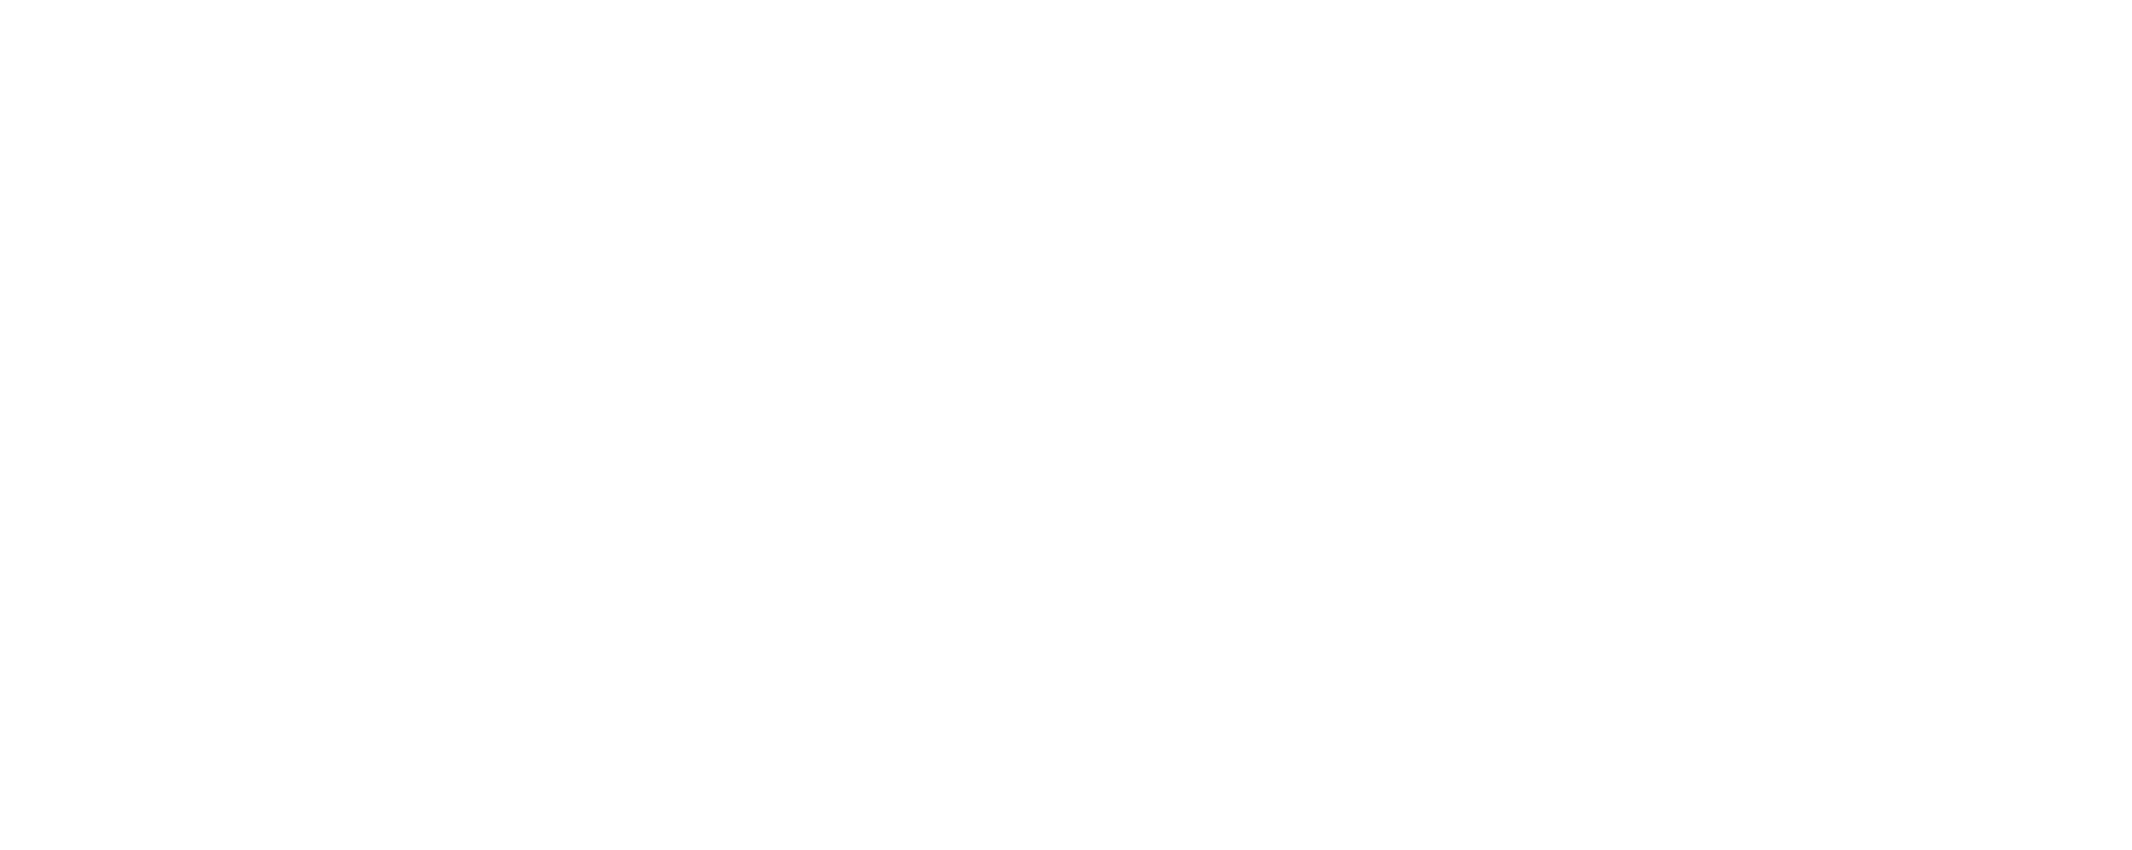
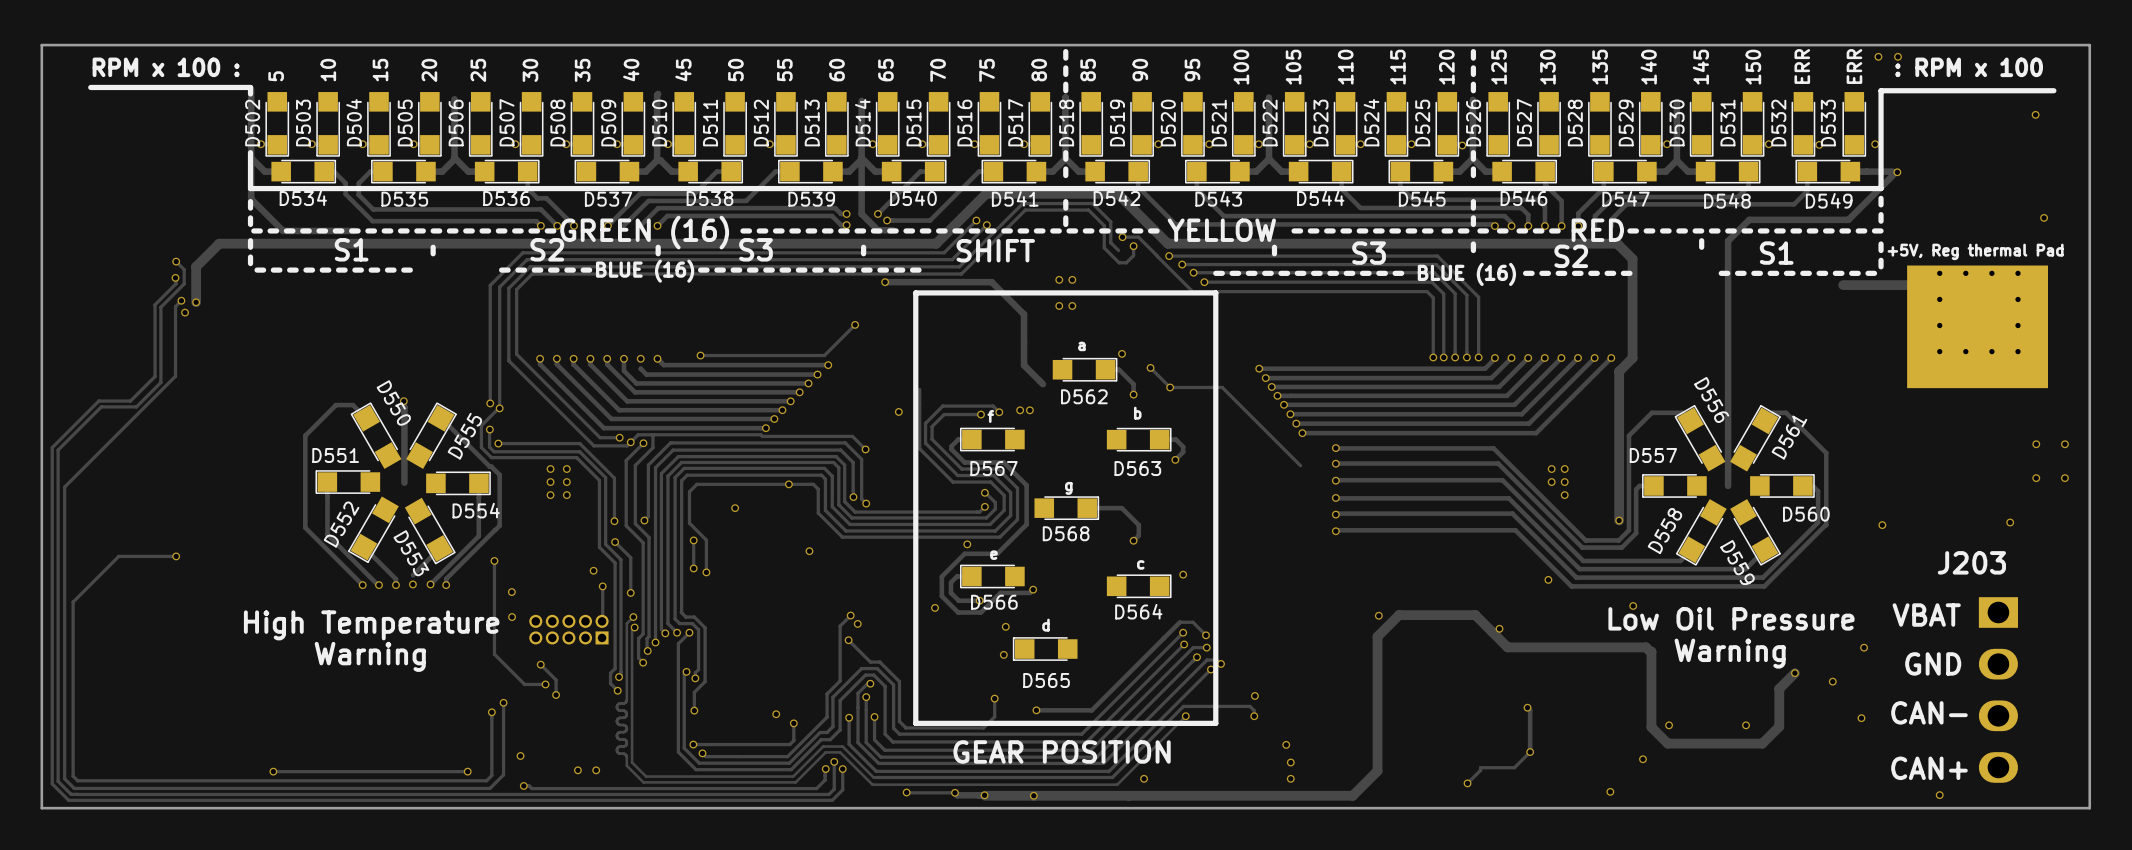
board edge: none -> (41, 45) (41, 808) (2089, 808) (2089, 45) (41, 45)
line: none -> (1065, 51) (1065, 58)
line: none -> (1473, 51) (1473, 58)
via: none -> (1878, 56)
via: none -> (1897, 56)
text: none -> ERR (1802, 66)
text: none -> ERR (1854, 66)
text: none -> RPM x 100 : (166, 67)
line: none -> (1065, 67) (1065, 74)
text: none -> 100 (1241, 67)
text: none -> 105 (1293, 67)
text: none -> 110 (1345, 67)
text: none -> 115 (1397, 67)
text: none -> 120 (1446, 67)
line: none -> (1473, 67) (1473, 74)
text: none -> 125 (1499, 67)
text: none -> 130 (1547, 67)
text: none -> 135 (1600, 67)
text: none -> 140 (1648, 67)
text: none -> 145 (1700, 67)
text: none -> 150 (1753, 67)
text: none -> : RPM x 100 (1969, 67)
text: none -> 10 (328, 70)
text: none -> 15 (380, 70)
text: none -> 20 (429, 70)
text: none -> 25 (478, 70)
text: none -> 30 (530, 70)
text: none -> 35 (582, 70)
text: none -> 40 (631, 70)
text: none -> 45 (683, 70)
text: none -> 50 (735, 70)
text: none -> 55 (784, 70)
text: none -> 60 (837, 70)
text: none -> 65 (885, 70)
text: none -> 70 (938, 70)
text: none -> 75 (987, 70)
text: none -> 80 (1039, 70)
text: none -> 85 (1088, 70)
text: none -> 90 (1140, 70)
text: none -> 95 (1192, 70)
text: none -> 5 (276, 76)
line: none -> (1065, 84) (1065, 90)
line: none -> (1473, 84) (1473, 90)
line: none -> (90, 87) (250, 87) (250, 93)
track: none -> (251, 89) (251, 199) (283, 230) (354, 230)
line: none -> (2053, 90) (1881, 90) (1881, 188) (250, 188) (250, 152)
track: none -> (658, 93) (657, 160)
track: none -> (1065, 97) (1065, 158) (1052, 171) (1036, 171)
track: none -> (1269, 97) (1269, 158)
track: none -> (454, 99) (454, 159) (442, 171) (425, 171)
track: none -> (1472, 99) (1472, 158) (1485, 171) (1502, 171)
track: none -> (861, 100) (861, 214) (877, 230) (892, 230)
track: none -> (1676, 101) (1676, 160)
via: none -> (2035, 114)
D502: none -> (277, 124)
D503: none -> (328, 124)
D504: none -> (379, 124)
D505: none -> (429, 124)
D506: none -> (480, 124)
D507: none -> (531, 124)
D508: none -> (582, 124)
D509: none -> (633, 124)
D510: none -> (684, 124)
D511: none -> (735, 124)
D512: none -> (785, 124)
D513: none -> (836, 124)
D514: none -> (887, 124)
D515: none -> (938, 124)
D516: none -> (989, 124)
D517: none -> (1040, 124)
D518: none -> (1091, 124)
D519: none -> (1142, 124)
D520: none -> (1192, 124)
D521: none -> (1243, 124)
D522: none -> (1294, 124)
D523: none -> (1345, 124)
D524: none -> (1396, 124)
D525: none -> (1447, 124)
D526: none -> (1498, 124)
D527: none -> (1549, 124)
D528: none -> (1599, 124)
D529: none -> (1650, 124)
D530: none -> (1701, 124)
D531: none -> (1752, 124)
D532: none -> (1803, 124)
D533: none -> (1854, 124)
via: none -> (260, 144)
via: none -> (311, 144)
via: none -> (362, 144)
via: none -> (413, 144)
via: none -> (515, 144)
via: none -> (566, 144)
via: none -> (617, 144)
via: none -> (667, 144)
via: none -> (769, 144)
via: none -> (872, 144)
via: none -> (922, 144)
via: none -> (974, 144)
via: none -> (1024, 144)
via: none -> (1158, 144)
via: none -> (1209, 144)
via: none -> (1258, 144)
via: none -> (1309, 144)
via: none -> (1360, 144)
via: none -> (1411, 144)
via: none -> (1667, 144)
via: none -> (1768, 144)
via: none -> (1819, 144)
via: none -> (1875, 144)
via: none -> (1462, 145)
line: none -> (1065, 152) (1065, 159)
line: none -> (1473, 152) (1473, 159)
track: none -> (251, 157) (264, 171) (281, 171)
track: none -> (454, 157) (468, 171) (484, 171)
track: none -> (861, 157) (875, 171) (891, 171)
track: none -> (1065, 158) (1078, 171) (1095, 171)
track: none -> (1269, 158) (1256, 171) (1239, 171)
track: none -> (1269, 158) (1281, 171) (1298, 171)
track: none -> (1472, 158) (1459, 171) (1443, 171)
track: none -> (861, 159) (849, 171) (832, 171)
track: none -> (657, 160) (645, 171) (629, 171)
track: none -> (657, 160) (660, 160) (671, 171) (688, 171)
track: none -> (1676, 160) (1665, 171) (1646, 171)
track: none -> (1676, 160) (1687, 171) (1705, 171)
line: none -> (1065, 169) (1065, 175)
line: none -> (1473, 169) (1473, 175)
D534: none -> (303, 171)
track: none -> (317, 171) (334, 171) (345, 183) (345, 194) (372, 221) (536, 221) (540, 225)
track: none -> (390, 171) (370, 171) (358, 183) (358, 195)
D535: none -> (403, 171)
D536: none -> (507, 171)
track: none -> (527, 171) (527, 188) (537, 198) (546, 198) (574, 225)
D537: none -> (606, 171)
D538: none -> (710, 171)
track: none -> (731, 171) (716, 171) (694, 193) (640, 193) (607, 225)
track: none -> (789, 171) (775, 171) (746, 200) (648, 200) (623, 225)
D539: none -> (810, 171)
D540: none -> (914, 171)
track: none -> (934, 171) (920, 171) (877, 214)
track: none -> (993, 171) (979, 171) (930, 220) (887, 220)
D541: none -> (1013, 171)
D542: none -> (1117, 171)
track: none -> (1138, 171) (1138, 187) (1175, 224) (1491, 224) (1493, 226)
track: none -> (1196, 171) (1196, 189) (1223, 216) (1504, 216) (1511, 222)
D543: none -> (1217, 171)
D544: none -> (1321, 171)
track: none -> (1341, 171) (1341, 189) (1360, 208) (1521, 208) (1528, 214) (1528, 226)
track: none -> (1400, 171) (1400, 186) (1413, 199) (1537, 199) (1544, 206) (1544, 226)
D545: none -> (1420, 171)
D546: none -> (1524, 171)
track: none -> (1545, 171) (1545, 184) (1561, 201) (1561, 226)
track: none -> (1603, 171) (1603, 187) (1578, 213) (1578, 226)
D547: none -> (1624, 171)
D548: none -> (1728, 171)
track: none -> (1748, 171) (1748, 186) (1737, 197) (1614, 197) (1594, 216) (1594, 226)
track: none -> (1807, 171) (1807, 191) (1794, 204) (1626, 204) (1611, 219) (1611, 226)
D549: none -> (1827, 171)
track: none -> (1850, 171) (1892, 171)
via: none -> (1897, 172)
track: none -> (1892, 175) (1848, 219) (1749, 219) (1728, 241) (1728, 485)
track: none -> (358, 195) (373, 209) (540, 209) (557, 225)
line: none -> (1881, 198) (1881, 204)
line: none -> (250, 201) (250, 208)
line: none -> (1065, 201) (1065, 208)
line: none -> (1473, 201) (1473, 208)
track: none -> (846, 214) (841, 214) (835, 208) (658, 208) (640, 225)
via: none -> (846, 214)
via: none -> (877, 214)
line: none -> (1881, 214) (1881, 221)
line: none -> (250, 217) (250, 224)
line: none -> (1065, 217) (1065, 224)
line: none -> (1473, 217) (1473, 224)
via: none -> (2044, 217)
via: none -> (887, 220)
track: none -> (976, 220) (944, 252) (522, 252) (490, 285) (490, 403)
via: none -> (976, 220)
via: none -> (540, 225)
via: none -> (557, 225)
via: none -> (574, 225)
via: none -> (607, 225)
via: none -> (657, 225)
track: none -> (846, 225) (841, 225) (831, 215) (667, 215) (657, 225)
via: none -> (846, 225)
track: none -> (986, 225) (952, 259) (527, 259) (499, 287) (499, 408) (481, 425) (481, 447) (491, 457) (576, 457) (599, 480) (599, 547) (615, 562) (615, 668) (610, 673) (610, 683) (617, 690)
via: none -> (986, 225)
via: none -> (1494, 226)
via: none -> (1511, 226)
via: none -> (1528, 226)
via: none -> (1544, 226)
via: none -> (1561, 226)
via: none -> (1578, 226)
line: none -> (253, 230) (260, 230)
line: none -> (270, 230) (276, 230)
line: none -> (286, 230) (292, 230)
line: none -> (302, 230) (309, 230)
line: none -> (319, 230) (325, 230)
line: none -> (335, 230) (341, 230)
line: none -> (351, 230) (358, 230)
line: none -> (367, 230) (374, 230)
line: none -> (384, 230) (390, 230)
line: none -> (400, 230) (407, 230)
line: none -> (416, 230) (423, 230)
line: none -> (433, 230) (439, 230)
line: none -> (449, 230) (455, 230)
line: none -> (465, 230) (472, 230)
line: none -> (482, 230) (488, 230)
line: none -> (498, 230) (504, 230)
line: none -> (514, 230) (521, 230)
line: none -> (530, 230) (537, 230)
line: none -> (547, 230) (553, 230)
line: none -> (742, 230) (749, 230)
line: none -> (759, 230) (765, 230)
line: none -> (775, 230) (782, 230)
line: none -> (791, 230) (798, 230)
line: none -> (808, 230) (814, 230)
line: none -> (824, 230) (830, 230)
line: none -> (840, 230) (847, 230)
line: none -> (857, 230) (863, 230)
line: none -> (873, 230) (879, 230)
line: none -> (889, 230) (896, 230)
line: none -> (905, 230) (912, 230)
line: none -> (922, 230) (928, 230)
line: none -> (938, 230) (945, 230)
line: none -> (954, 230) (961, 230)
line: none -> (971, 230) (977, 230)
line: none -> (987, 230) (994, 230)
line: none -> (1003, 230) (1010, 230)
line: none -> (1020, 230) (1026, 230)
line: none -> (1036, 230) (1042, 230)
line: none -> (1052, 230) (1059, 230)
line: none -> (1069, 230) (1075, 230)
line: none -> (1085, 230) (1091, 230)
line: none -> (1101, 230) (1108, 230)
line: none -> (1117, 230) (1124, 230)
line: none -> (1134, 230) (1140, 230)
line: none -> (1150, 230) (1157, 230)
text: none -> YELLOW (1221, 230)
line: none -> (1294, 230) (1300, 230)
line: none -> (1310, 230) (1316, 230)
line: none -> (1326, 230) (1333, 230)
line: none -> (1342, 230) (1349, 230)
line: none -> (1359, 230) (1365, 230)
line: none -> (1375, 230) (1382, 230)
line: none -> (1391, 230) (1398, 230)
line: none -> (1408, 230) (1414, 230)
line: none -> (1424, 230) (1431, 230)
line: none -> (1444, 230) (1450, 230)
line: none -> (1460, 230) (1466, 230)
line: none -> (1479, 230) (1486, 230)
line: none -> (1499, 230) (1506, 230)
line: none -> (1519, 230) (1525, 230)
line: none -> (1535, 230) (1541, 230)
line: none -> (1551, 230) (1558, 230)
text: none -> RED (1597, 230)
line: none -> (1629, 230) (1636, 230)
line: none -> (1646, 230) (1652, 230)
line: none -> (1662, 230) (1669, 230)
line: none -> (1678, 230) (1685, 230)
line: none -> (1695, 230) (1701, 230)
line: none -> (1711, 230) (1717, 230)
line: none -> (1727, 230) (1734, 230)
line: none -> (1744, 230) (1750, 230)
line: none -> (1760, 230) (1766, 230)
line: none -> (1776, 230) (1783, 230)
line: none -> (1792, 230) (1799, 230)
line: none -> (1809, 230) (1815, 230)
line: none -> (1825, 230) (1832, 230)
line: none -> (1841, 230) (1848, 230)
line: none -> (1858, 230) (1864, 230)
line: none -> (1874, 230) (1881, 230)
text: none -> GREEN (16) (644, 232)
track: none -> (1122, 237) (1138, 237) (1192, 291) (1427, 291) (1433, 297) (1433, 357)
via: none -> (1122, 237)
line: none -> (250, 240) (250, 247)
line: none -> (1701, 240) (1701, 247)
line: none -> (1473, 244) (1473, 250)
line: none -> (1881, 244) (1881, 250)
track: none -> (1133, 246) (1133, 255) (1126, 262) (1119, 262) (1104, 247) (1104, 225) (1088, 210) (1025, 210) (961, 274) (532, 274) (516, 289) (516, 354) (600, 437) (619, 437)
via: none -> (1133, 246)
line: none -> (433, 247) (433, 253)
line: none -> (658, 247) (658, 253)
line: none -> (863, 247) (863, 253)
line: none -> (1274, 247) (1274, 253)
text: none -> S1 (351, 249)
text: none -> S2 (547, 249)
text: none -> S3 (755, 249)
text: none -> SHIFT (995, 250)
track: none -> (1118, 250) (1110, 242) (1110, 221) (1092, 203) (1022, 203) (959, 266) (530, 266) (508, 288) (508, 360) (593, 445) (627, 445) (638, 434) (760, 434) (762, 436) (852, 436) (865, 449)
text: none -> +5V, Reg thermal Pad (1975, 251)
text: none -> S3 (1369, 253)
text: none -> S1 (1776, 253)
track: none -> (1169, 256) (1437, 256) (1478, 297) (1478, 357)
via: none -> (1169, 256)
text: none -> S2 (1571, 256)
line: none -> (250, 257) (250, 263)
line: none -> (1881, 260) (1881, 266)
track: none -> (176, 261) (184, 269) (184, 283) (160, 307) (160, 382) (136, 406) (101, 406) (58, 450) (58, 781) (71, 794) (77, 794)
via: none -> (176, 261)
track: none -> (1182, 264) (1436, 264) (1466, 295) (1466, 357)
via: none -> (1182, 264)
line: none -> (257, 270) (263, 270)
line: none -> (273, 270) (279, 270)
line: none -> (289, 270) (296, 270)
line: none -> (305, 270) (312, 270)
line: none -> (322, 270) (328, 270)
line: none -> (338, 270) (345, 270)
line: none -> (354, 270) (361, 270)
line: none -> (371, 270) (377, 270)
line: none -> (387, 270) (394, 270)
line: none -> (403, 270) (410, 270)
line: none -> (501, 270) (508, 270)
line: none -> (517, 270) (524, 270)
line: none -> (534, 270) (540, 270)
line: none -> (550, 270) (557, 270)
line: none -> (566, 270) (573, 270)
line: none -> (583, 270) (589, 270)
line: none -> (700, 270) (707, 270)
line: none -> (716, 270) (723, 270)
line: none -> (733, 270) (739, 270)
line: none -> (749, 270) (755, 270)
line: none -> (765, 270) (772, 270)
line: none -> (782, 270) (788, 270)
line: none -> (798, 270) (804, 270)
line: none -> (814, 270) (821, 270)
line: none -> (830, 270) (837, 270)
line: none -> (847, 270) (853, 270)
line: none -> (863, 270) (870, 270)
line: none -> (879, 270) (886, 270)
line: none -> (896, 270) (902, 270)
line: none -> (912, 270) (919, 270)
text: none -> BLUE (16) (645, 271)
track: none -> (1193, 272) (1434, 272) (1455, 293) (1455, 357)
via: none -> (1193, 272)
line: none -> (1215, 273) (1222, 273)
line: none -> (1232, 273) (1238, 273)
line: none -> (1248, 273) (1254, 273)
line: none -> (1264, 273) (1271, 273)
line: none -> (1281, 273) (1287, 273)
line: none -> (1297, 273) (1303, 273)
line: none -> (1313, 273) (1320, 273)
line: none -> (1329, 273) (1336, 273)
line: none -> (1346, 273) (1352, 273)
line: none -> (1362, 273) (1369, 273)
line: none -> (1378, 273) (1385, 273)
line: none -> (1395, 273) (1401, 273)
line: none -> (1525, 273) (1532, 273)
line: none -> (1541, 273) (1548, 273)
line: none -> (1558, 273) (1564, 273)
line: none -> (1574, 273) (1581, 273)
line: none -> (1590, 273) (1597, 273)
line: none -> (1607, 273) (1613, 273)
line: none -> (1623, 273) (1629, 273)
line: none -> (1721, 273) (1727, 273)
line: none -> (1737, 273) (1744, 273)
line: none -> (1753, 273) (1760, 273)
line: none -> (1770, 273) (1776, 273)
line: none -> (1786, 273) (1792, 273)
line: none -> (1802, 273) (1809, 273)
line: none -> (1819, 273) (1825, 273)
line: none -> (1835, 273) (1841, 273)
line: none -> (1851, 273) (1858, 273)
line: none -> (1867, 273) (1874, 273)
text: none -> BLUE (16) (1466, 274)
via: none -> (175, 277)
track: none -> (176, 277) (176, 283) (155, 304) (155, 376) (130, 401) (98, 401) (52, 447) (52, 783) (68, 800) (832, 800) (842, 789) (842, 769)
via: none -> (1059, 279)
via: none -> (1072, 279)
track: none -> (885, 282) (991, 282) (1024, 314) (1024, 365) (1042, 384)
via: none -> (885, 282)
track: none -> (1204, 282) (1431, 282) (1443, 293) (1443, 357)
via: none -> (1204, 282)
track: none -> (1843, 285) (1935, 285) (1977, 326)
line: none -> (915, 292) (915, 723) (1215, 723) (1215, 292) (915, 292)
track: none -> (181, 300) (175, 306) (175, 376) (64, 487) (64, 778) (74, 788) (490, 788) (503, 774) (503, 702)
via: none -> (181, 300)
track: none -> (196, 302) (196, 266) (219, 243) (936, 243) (986, 193) (1117, 193) (1167, 243) (1617, 243) (1632, 258) (1632, 358) (1619, 371) (1619, 520)
via: none -> (196, 302)
via: none -> (1059, 305)
via: none -> (1072, 305)
via: none -> (185, 312)
track: none -> (855, 324) (824, 355) (700, 355)
via: none -> (855, 324)
part: none -> (1977, 326)
text: none -> a (1081, 346)
via: none -> (1122, 353)
via: none -> (700, 355)
via: none -> (1433, 357)
via: none -> (1443, 357)
via: none -> (1455, 357)
via: none -> (1466, 357)
via: none -> (1478, 357)
track: none -> (540, 358) (540, 364) (603, 428) (765, 428)
via: none -> (540, 358)
track: none -> (556, 358) (556, 364) (611, 418) (774, 418)
via: none -> (556, 358)
via: none -> (573, 358)
via: none -> (590, 358)
track: none -> (607, 358) (607, 364) (635, 392) (799, 392)
via: none -> (607, 358)
track: none -> (623, 358) (623, 370) (636, 383) (808, 383)
via: none -> (623, 358)
via: none -> (640, 358)
via: none -> (657, 358)
track: none -> (1494, 358) (1485, 368) (1259, 368)
via: none -> (1494, 358)
track: none -> (1511, 358) (1491, 378) (1265, 378)
via: none -> (1511, 358)
track: none -> (1528, 358) (1499, 386) (1271, 386)
via: none -> (1528, 358)
track: none -> (1544, 358) (1506, 395) (1277, 395)
via: none -> (1544, 358)
track: none -> (1561, 358) (1514, 404) (1284, 404)
via: none -> (1561, 358)
track: none -> (1578, 358) (1521, 414) (1290, 414)
via: none -> (1578, 358)
track: none -> (1594, 358) (1529, 423) (1296, 423)
via: none -> (1594, 358)
track: none -> (1611, 358) (1536, 433) (1302, 433)
via: none -> (1611, 358)
track: none -> (657, 359) (663, 365) (828, 365)
track: none -> (573, 364) (619, 410) (782, 410)
track: none -> (590, 364) (627, 401) (790, 401)
via: none -> (828, 365)
track: none -> (1150, 367) (1170, 387) (1222, 387) (1300, 465)
via: none -> (1150, 367)
track: none -> (641, 368) (646, 374) (817, 374)
via: none -> (1259, 368)
D562: none -> (1085, 369)
track: none -> (1105, 369) (1119, 369) (1133, 384) (1133, 394)
via: none -> (817, 374)
via: none -> (1265, 378)
via: none -> (808, 383)
via: none -> (1271, 386)
via: none -> (1170, 387)
track: none -> (919, 389) (919, 448) (952, 482) (990, 482) (1004, 495) (1004, 510) (990, 524) (849, 524) (832, 506) (832, 476) (824, 468) (684, 468) (675, 477) (675, 619) (679, 623) (692, 623) (698, 629) (698, 669) (695, 672) (695, 678)
via: none -> (799, 392)
via: none -> (1133, 394)
via: none -> (1277, 395)
track: none -> (403, 401) (404, 482)
via: none -> (403, 401)
via: none -> (790, 401)
via: none -> (490, 403)
via: none -> (1284, 404)
via: none -> (499, 408)
via: none -> (782, 410)
via: none -> (1020, 410)
via: none -> (1029, 410)
via: none -> (898, 411)
track: none -> (999, 412) (993, 406) (942, 406) (925, 423) (925, 443) (957, 475) (993, 475) (1010, 492) (1010, 515) (995, 530) (845, 530) (825, 510) (825, 479) (821, 475) (687, 475) (681, 480) (681, 612) (685, 617) (694, 617) (705, 627) (705, 681) (694, 692) (694, 710)
via: none -> (999, 412)
text: none -> b (1137, 413)
track: none -> (980, 414) (944, 414) (932, 426) (932, 439) (961, 469) (998, 469) (1017, 488) (1017, 519) (999, 537) (842, 537) (818, 513) (818, 489) (813, 484) (696, 484) (689, 491) (689, 523) (706, 540) (706, 572)
via: none -> (980, 414)
via: none -> (1290, 414)
text: none -> f (990, 416)
track: none -> (366, 418) (352, 405) (335, 405) (305, 435) (305, 527) (362, 585)
track: none -> (441, 418) (499, 474) (499, 525) (446, 578) (446, 585)
via: none -> (774, 418)
track: none -> (1690, 420) (1682, 412) (1651, 412) (1628, 435) (1628, 530) (1618, 540) (1585, 540) (1493, 448) (1335, 448)
track: none -> (1765, 420) (1773, 412) (1786, 412) (1826, 453) (1826, 525) (1764, 586) (1571, 586) (1515, 530) (1335, 531)
via: none -> (1296, 423)
via: none -> (765, 428)
track: none -> (489, 429) (489, 447) (494, 451) (579, 451) (605, 477) (605, 544) (620, 559) (620, 675) (619, 677)
via: none -> (489, 429)
via: none -> (1302, 433)
track: none -> (652, 434) (652, 447) (635, 465) (635, 523) (649, 537) (647, 650)
D550: none -> (376, 435)
D555: none -> (431, 435)
via: none -> (619, 437)
D556: none -> (1699, 438)
D561: none -> (1755, 438)
track: none -> (971, 439) (958, 439) (951, 446) (951, 449) (964, 462) (1003, 462) (1026, 485) (1026, 524) (997, 553) (964, 553) (941, 576) (941, 596) (958, 612) (980, 612) (1000, 592) (1029, 592) (1033, 589)
D567: none -> (992, 439)
D563: none -> (1139, 439)
track: none -> (1159, 439) (1176, 439) (1183, 446) (1183, 452) (1175, 459)
via: none -> (630, 442)
track: none -> (498, 443) (579, 443) (614, 478) (614, 521)
via: none -> (498, 443)
track: none -> (643, 443) (626, 460) (626, 525) (643, 542) (643, 634) (638, 638) (638, 658) (643, 662)
via: none -> (643, 443)
via: none -> (2036, 444)
via: none -> (2064, 444)
via: none -> (1335, 448)
via: none -> (865, 449)
via: none -> (1175, 459)
track: none -> (1335, 463) (1498, 463) (1582, 547) (1621, 547) (1636, 533) (1636, 489) (1639, 485) (1653, 485)
via: none -> (1335, 463)
via: none -> (550, 469)
via: none -> (566, 469)
via: none -> (1551, 469)
via: none -> (1564, 469)
via: none -> (2036, 478)
via: none -> (2064, 478)
track: none -> (1335, 480) (1502, 480) (1583, 560) (1680, 560) (1691, 549)
via: none -> (1335, 480)
D551: none -> (347, 482)
via: none -> (550, 482)
via: none -> (566, 482)
via: none -> (1551, 482)
via: none -> (1564, 482)
D554: none -> (458, 483)
via: none -> (788, 484)
D557: none -> (1674, 485)
D560: none -> (1782, 485)
track: none -> (1802, 485) (1812, 485) (1818, 491) (1818, 522) (1762, 577) (1576, 577) (1512, 513) (1335, 514)
text: none -> g (1068, 488)
via: none -> (984, 492)
track: none -> (985, 492) (995, 502) (995, 509) (986, 517) (851, 517) (838, 504) (838, 467) (833, 462) (681, 462) (667, 476) (667, 623) (677, 632)
via: none -> (550, 495)
via: none -> (566, 495)
via: none -> (1564, 495)
track: none -> (327, 496) (327, 534) (379, 585)
track: none -> (478, 497) (478, 536) (430, 584)
track: none -> (853, 497) (853, 462) (840, 450) (673, 450) (655, 467) (655, 642)
via: none -> (853, 497)
track: none -> (1335, 497) (1508, 498) (1579, 569) (1745, 569) (1765, 549)
via: none -> (1335, 497)
track: none -> (866, 503) (861, 499) (861, 459) (845, 442) (670, 442) (648, 465) (648, 516) (644, 520)
via: none -> (866, 503)
track: none -> (984, 506) (979, 512) (855, 512) (844, 501) (844, 465) (836, 456) (678, 456) (661, 473) (661, 629) (665, 633)
via: none -> (984, 506)
via: none -> (735, 508)
D568: none -> (1066, 508)
track: none -> (1087, 508) (1121, 508) (1138, 525) (1138, 535) (1133, 540)
via: none -> (1335, 514)
via: none -> (644, 520)
via: none -> (1619, 520)
via: none -> (614, 521)
via: none -> (2010, 522)
via: none -> (1882, 525)
D552: none -> (373, 529)
D553: none -> (430, 531)
via: none -> (1335, 531)
D558: none -> (1701, 532)
D559: none -> (1755, 532)
track: none -> (693, 540) (693, 568)
via: none -> (693, 540)
via: none -> (1133, 540)
track: none -> (615, 542) (630, 557) (630, 592)
via: none -> (615, 542)
via: none -> (967, 544)
track: none -> (363, 547) (395, 579) (395, 585)
track: none -> (439, 548) (412, 575)
via: none -> (809, 551)
text: none -> e (994, 555)
track: none -> (176, 556) (118, 556) (73, 602) (73, 776) (77, 780) (486, 780) (491, 775) (491, 712)
via: none -> (176, 556)
track: none -> (494, 560) (494, 654) (524, 684) (545, 684)
via: none -> (494, 560)
text: none -> J203 (1971, 562)
text: none -> c (1140, 564)
via: none -> (693, 568)
via: none -> (593, 570)
via: none -> (706, 572)
via: none -> (1183, 574)
track: none -> (971, 576) (956, 576) (950, 582) (950, 592) (958, 600) (979, 600)
D566: none -> (992, 576)
via: none -> (1548, 579)
via: none -> (412, 584)
via: none -> (430, 584)
via: none -> (362, 585)
via: none -> (379, 585)
via: none -> (395, 585)
via: none -> (446, 585)
track: none -> (602, 586) (602, 621)
via: none -> (602, 586)
D564: none -> (1139, 586)
via: none -> (1033, 589)
via: none -> (511, 592)
via: none -> (630, 592)
via: none -> (979, 600)
via: none -> (1633, 605)
via: none -> (935, 607)
track: none -> (850, 615) (840, 626) (840, 680) (827, 694) (827, 717) (787, 756) (705, 756) (702, 753)
via: none -> (850, 615)
via: none -> (1378, 615)
text: none -> VBAT (1926, 615)
via: none -> (512, 617)
track: none -> (633, 617) (626, 623) (626, 700) (618, 704) (616, 707) (618, 709) (626, 713) (625, 717) (618, 718) (616, 721) (618, 724) (626, 727) (625, 731) (618, 732) (616, 735) (618, 738) (625, 740) (626, 743) (618, 747) (616, 750) (618, 753) (626, 755) (626, 765) (643, 782) (795, 782) (825, 752) (840, 752) (872, 784) (1117, 784) (1185, 716)
via: none -> (633, 617)
text: none -> Low Oil Pressure (1731, 618)
via: none -> (857, 623)
text: none -> High Temperature (371, 625)
text: none -> d (1045, 625)
via: none -> (1005, 626)
track: none -> (634, 627) (632, 629) (632, 762) (646, 776) (793, 776) (823, 746) (842, 746) (873, 777) (1112, 777) (1183, 706) (1250, 706) (1254, 710) (1254, 716)
via: none -> (634, 627)
via: none -> (1499, 628)
part: none -> (568, 629)
via: none -> (677, 632)
track: none -> (689, 632) (678, 643) (678, 752) (695, 769) (791, 769) (821, 739) (830, 739) (840, 729) (840, 700) (865, 675) (873, 675) (885, 686) (885, 734) (892, 741) (1086, 741) (1184, 644)
via: none -> (689, 632)
track: none -> (1183, 632) (1081, 734) (899, 734) (893, 728) (893, 684) (877, 668) (861, 668) (832, 697) (832, 726) (827, 732) (820, 732) (789, 763) (699, 763) (684, 748) (684, 674) (686, 671)
via: none -> (1183, 632)
via: none -> (665, 633)
track: none -> (1206, 635) (1192, 622) (1179, 622) (1091, 710) (1036, 710)
via: none -> (1206, 635)
track: none -> (848, 640) (870, 662) (879, 662) (899, 681) (899, 721) (905, 727) (983, 727) (994, 716) (994, 698)
via: none -> (848, 640)
via: none -> (655, 642)
via: none -> (1184, 644)
track: none -> (1206, 647) (1193, 647) (1090, 750) (884, 750) (874, 739) (874, 716)
via: none -> (1206, 647)
via: none -> (1864, 647)
D565: none -> (1045, 649)
via: none -> (647, 650)
text: none -> Warning (1730, 653)
via: none -> (1003, 654)
text: none -> Warning (370, 656)
via: none -> (1197, 657)
track: none -> (1192, 661) (1096, 757) (880, 757) (866, 742) (866, 697)
via: none -> (643, 662)
track: none -> (1221, 663) (1217, 660) (1206, 660) (1103, 763) (878, 763) (857, 742) (857, 693) (867, 683) (870, 683)
via: none -> (1221, 663)
text: none -> GND (1933, 663)
track: none -> (540, 664) (556, 680) (556, 695)
via: none -> (540, 664)
track: none -> (1210, 669) (1108, 771) (876, 771) (849, 744) (849, 717)
via: none -> (1210, 669)
via: none -> (686, 671)
track: none -> (1794, 673) (1779, 688) (1779, 726) (1762, 743) (1667, 743) (1651, 727) (1651, 651) (1646, 647) (1507, 647) (1475, 615) (1399, 615) (1377, 636) (1377, 770) (1352, 795) (985, 795) (957, 795) (955, 792) (906, 792)
via: none -> (1794, 673)
via: none -> (619, 677)
via: none -> (695, 678)
via: none -> (1832, 681)
via: none -> (870, 683)
via: none -> (545, 684)
part: none -> (1998, 689)
via: none -> (617, 690)
via: none -> (556, 695)
via: none -> (1254, 695)
via: none -> (866, 697)
via: none -> (994, 698)
via: none -> (503, 702)
track: none -> (1527, 707) (1530, 710) (1530, 752) (1514, 767) (1480, 767) (1480, 770) (1467, 783)
via: none -> (1527, 707)
via: none -> (694, 710)
via: none -> (1036, 710)
via: none -> (491, 712)
text: none -> CAN- (1929, 712)
via: none -> (776, 714)
via: none -> (874, 716)
via: none -> (1185, 716)
via: none -> (1254, 716)
via: none -> (849, 717)
via: none -> (1861, 718)
track: none -> (793, 723) (793, 740) (789, 744) (693, 744)
via: none -> (793, 723)
via: none -> (1669, 725)
via: none -> (1746, 725)
via: none -> (693, 744)
via: none -> (1286, 744)
text: none -> GEAR POSITION (1062, 751)
via: none -> (1530, 752)
via: none -> (702, 753)
via: none -> (520, 755)
via: none -> (1642, 759)
track: none -> (834, 761) (834, 789) (829, 794) (77, 794)
via: none -> (834, 761)
via: none -> (1290, 762)
text: none -> CAN+ (1929, 768)
via: none -> (825, 769)
via: none -> (842, 769)
via: none -> (577, 770)
via: none -> (596, 770)
track: none -> (825, 770) (825, 780) (816, 788) (531, 788) (529, 785) (523, 785)
track: none -> (273, 771) (467, 771)
via: none -> (273, 771)
via: none -> (467, 771)
via: none -> (1144, 778)
via: none -> (1290, 778)
via: none -> (1467, 783)
via: none -> (523, 785)
via: none -> (1610, 791)
via: none -> (906, 792)
via: none -> (955, 792)
via: none -> (984, 795)
via: none -> (1033, 795)
via: none -> (1939, 795)

